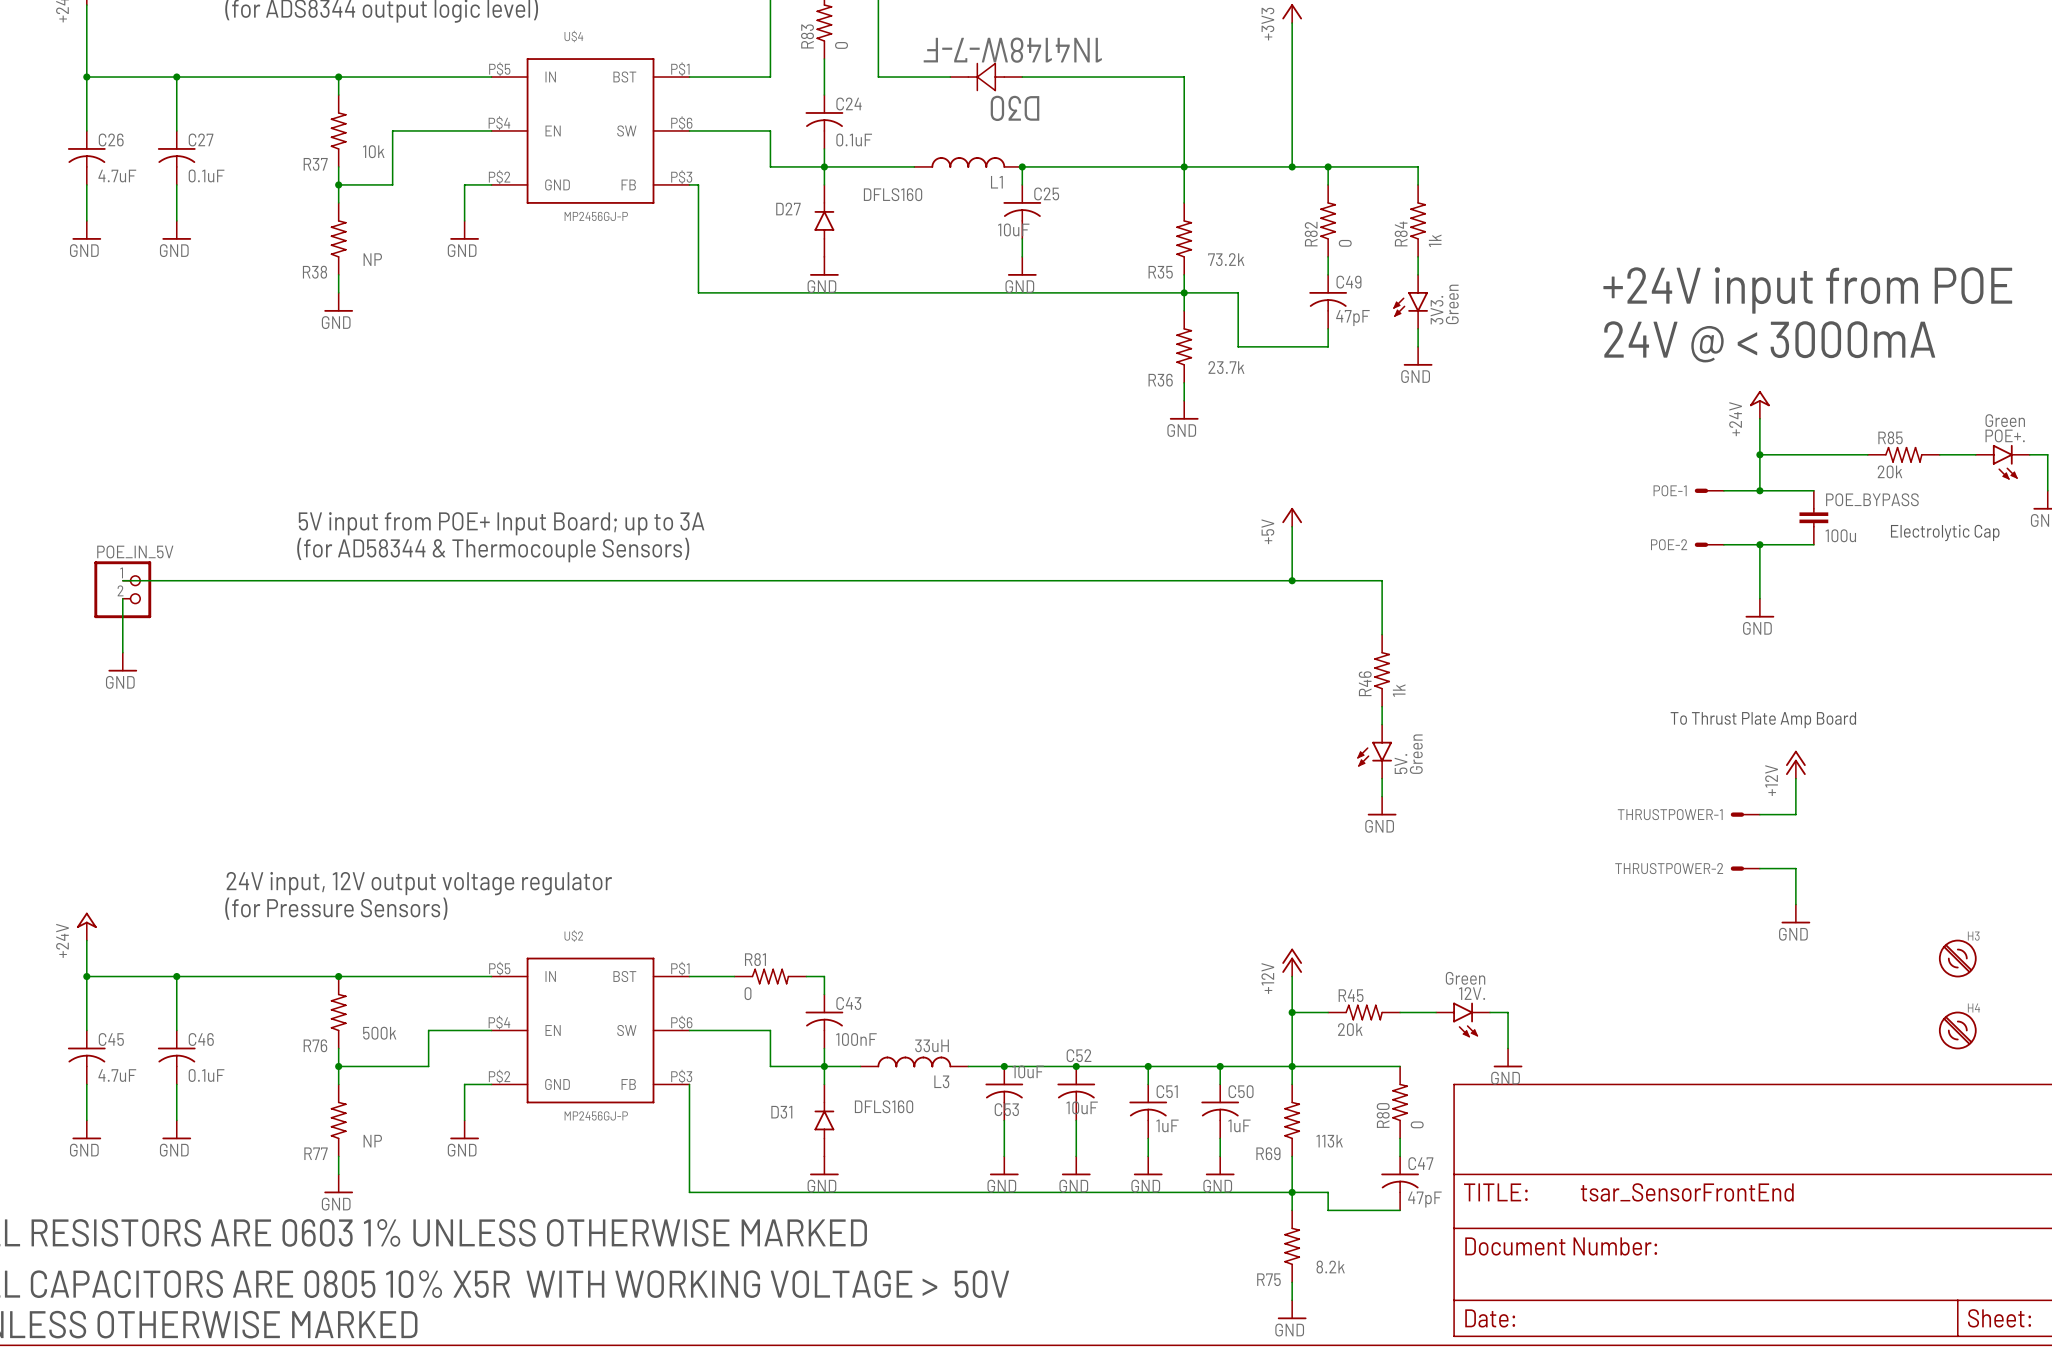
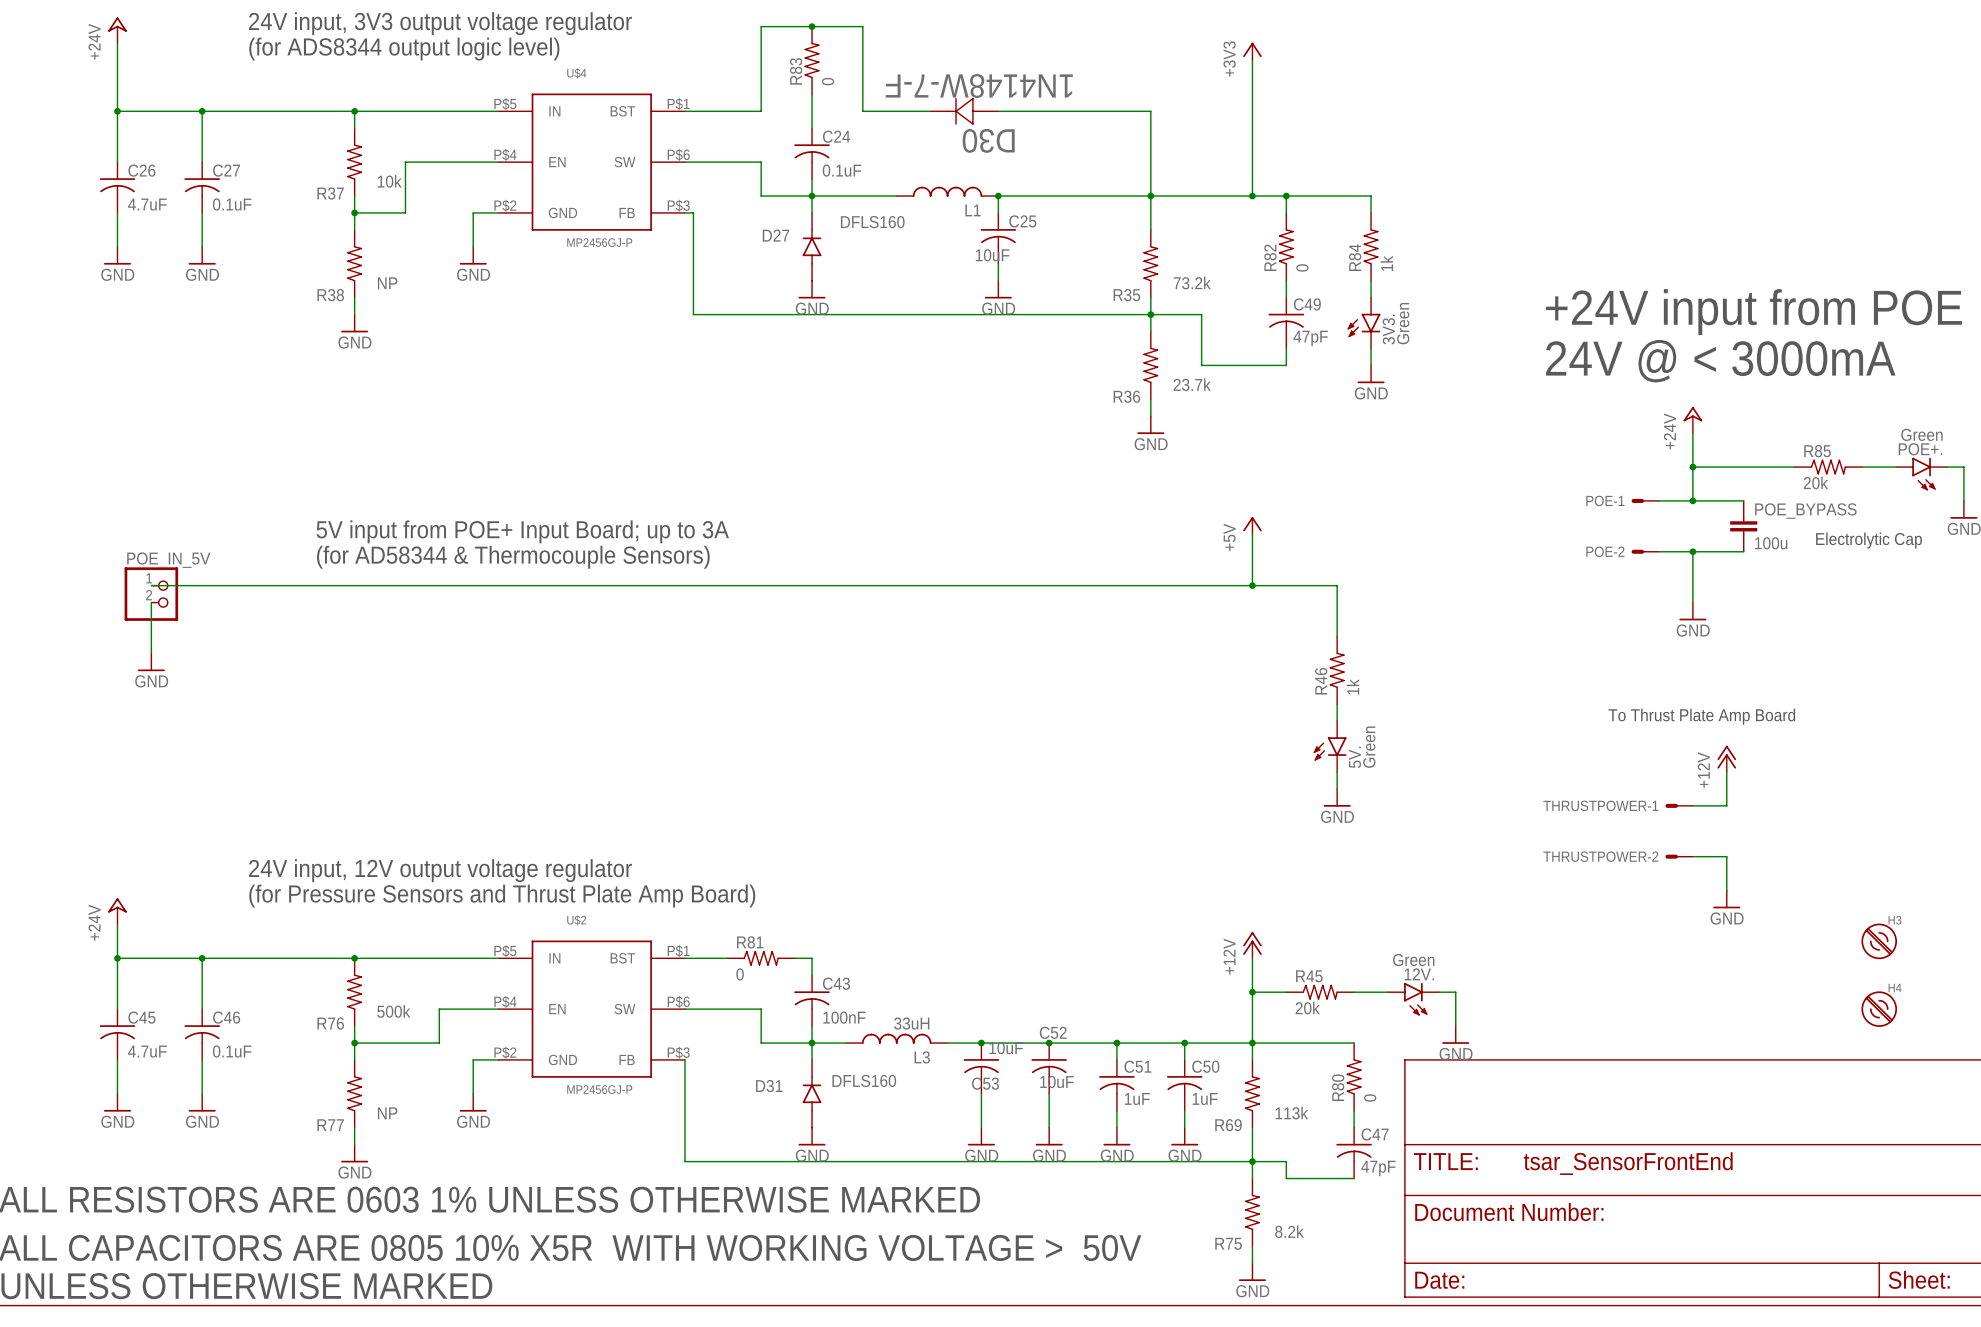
text: (for Pressure Sensors) (336, 908) -> (for Pressure Sensors and Thrust Plate Amp Board) (502, 896)

